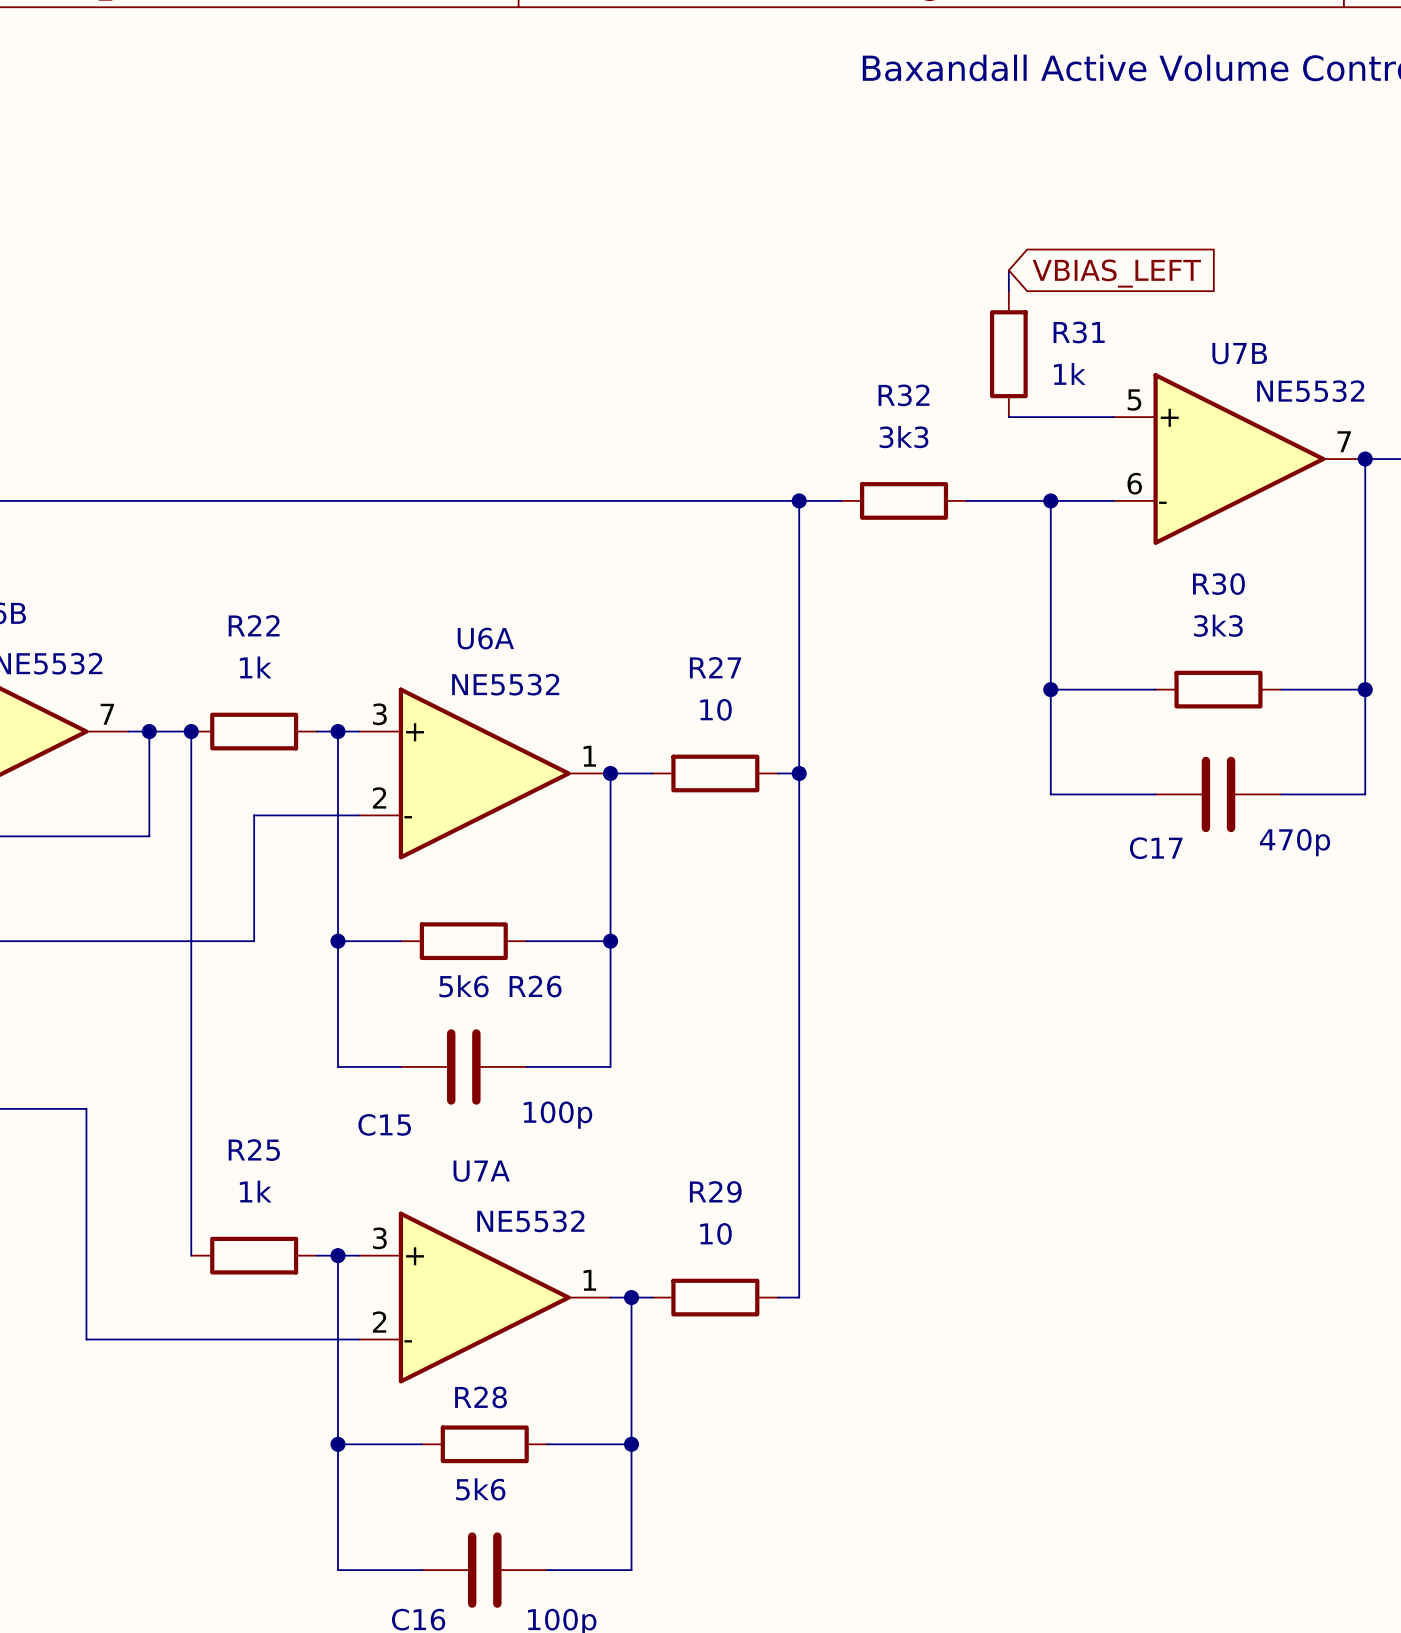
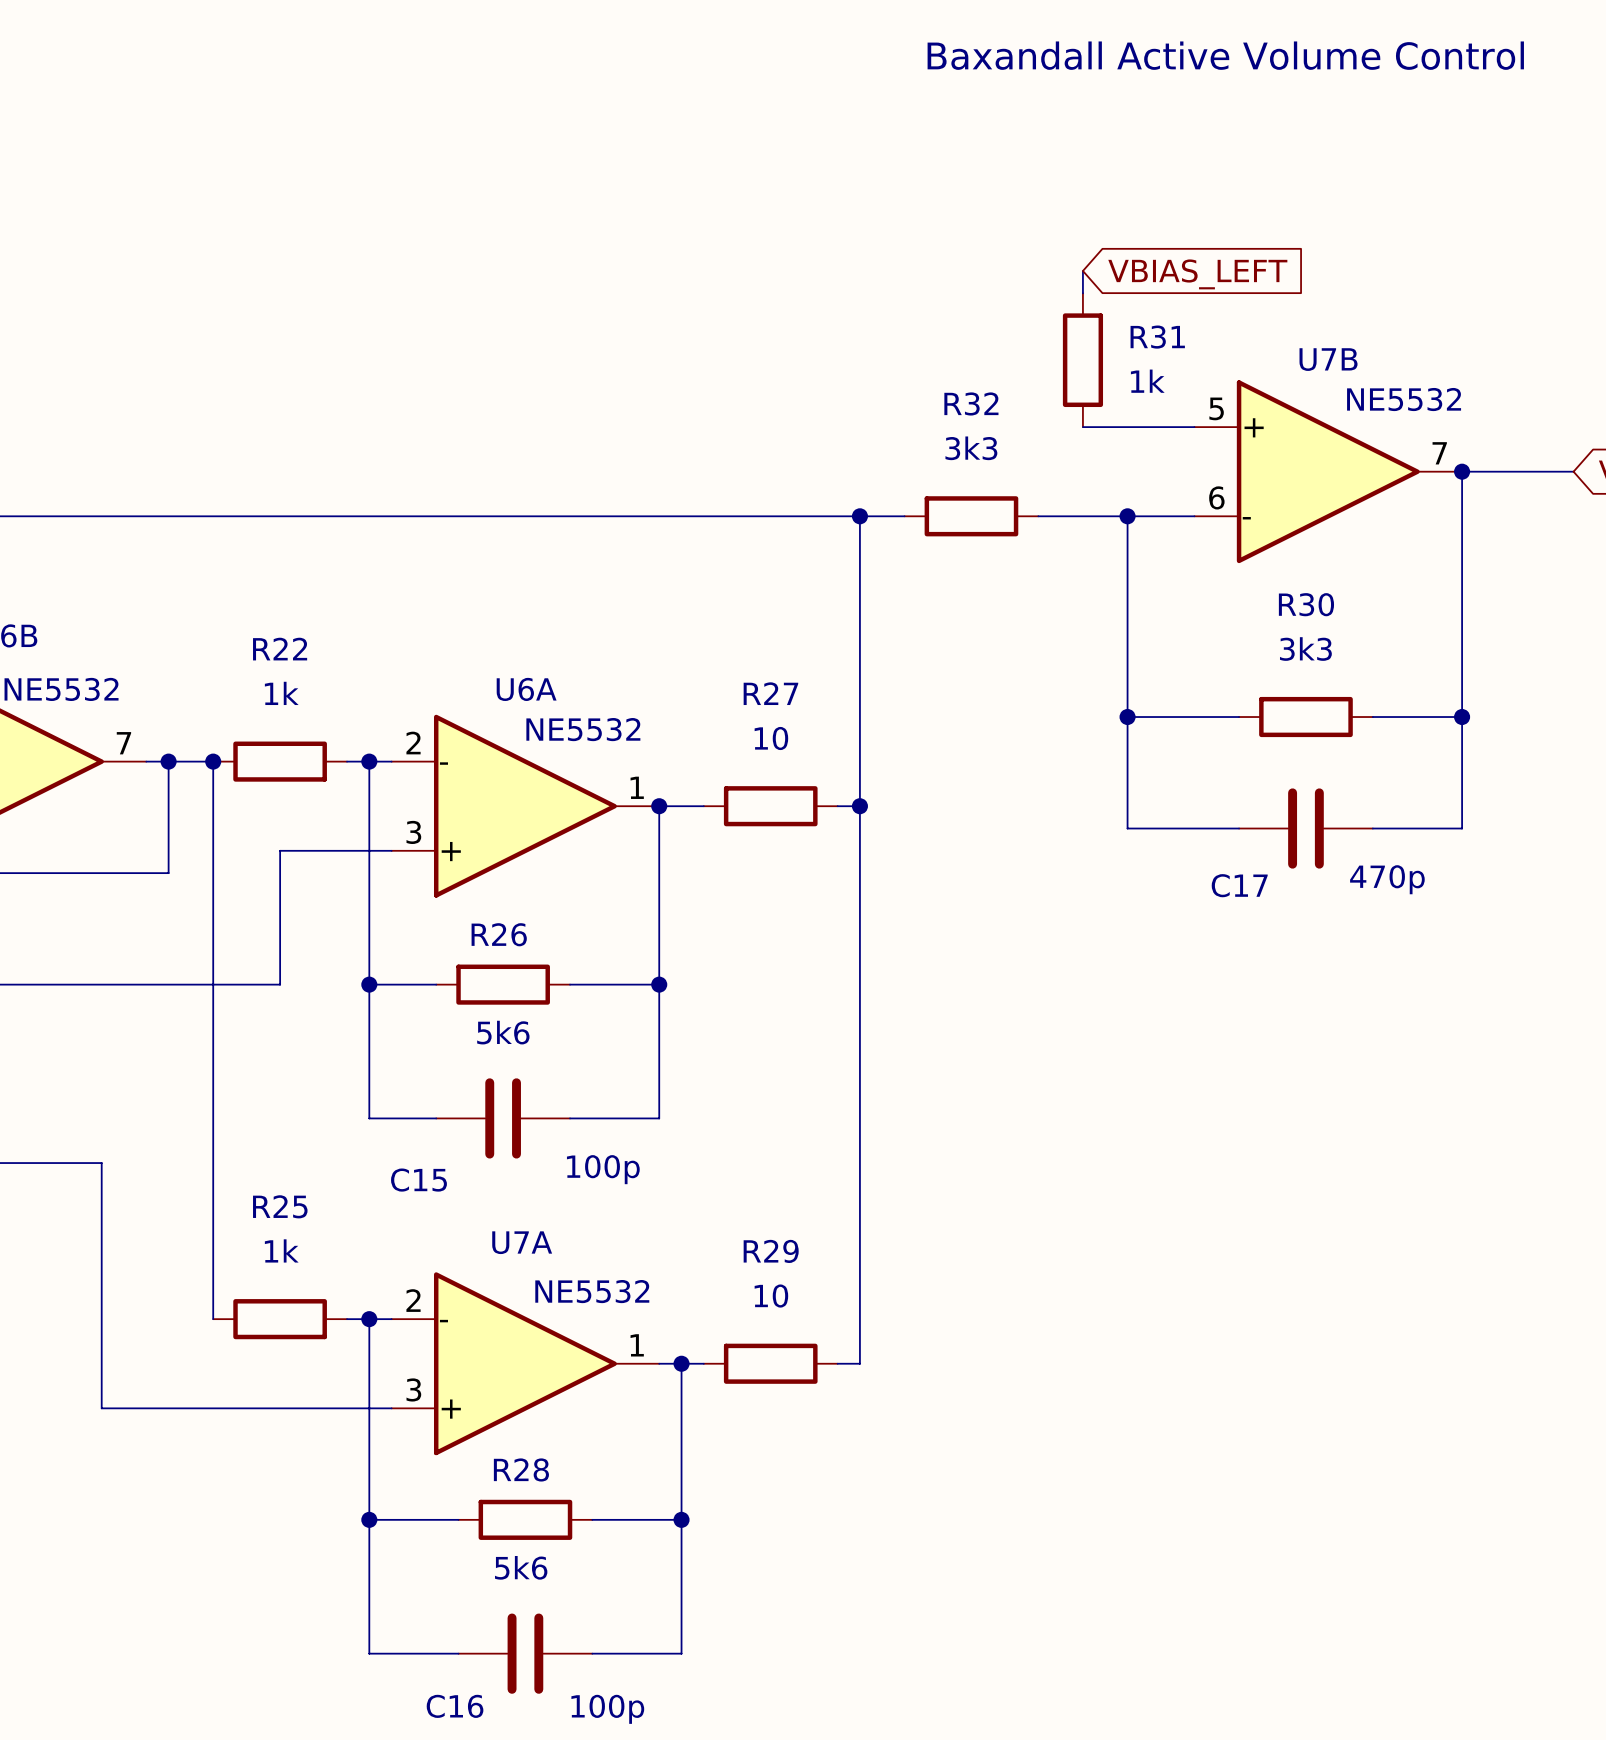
U6A value position: NE5532 (505, 684) -> NE5532 (583, 729)
U6A flip: as is (484, 773) -> up-down (525, 806)
R26 name position: R26 (535, 986) -> R26 (499, 934)
U7A flip: as is (484, 1297) -> up-down (525, 1363)

